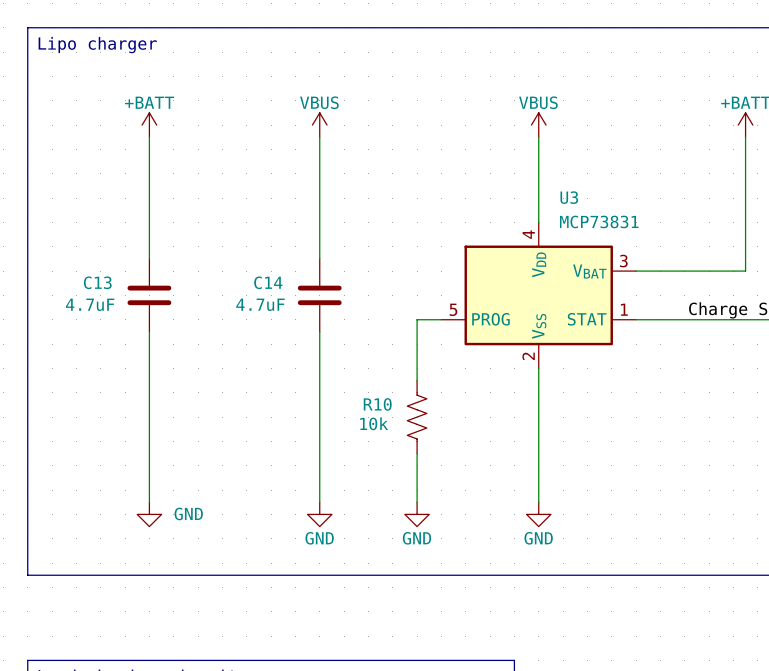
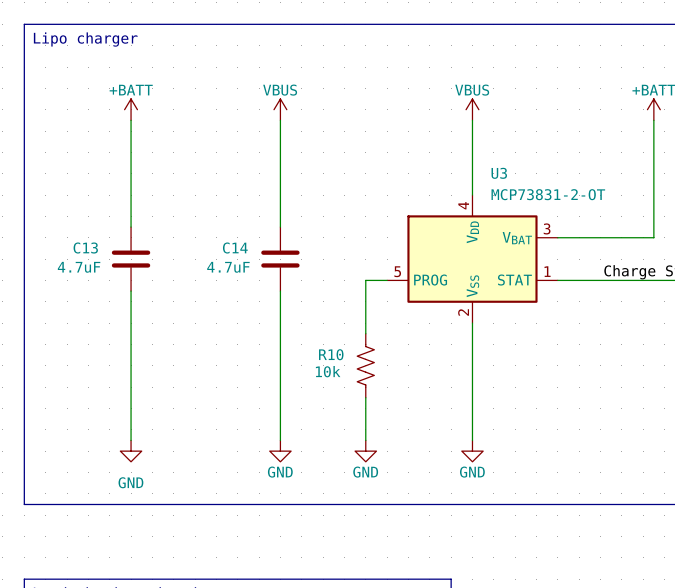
U3 value: MCP73831 (599, 221) -> MCP73831-2-OT (548, 194)
power symbol text position: GND (188, 513) -> GND (130, 482)

